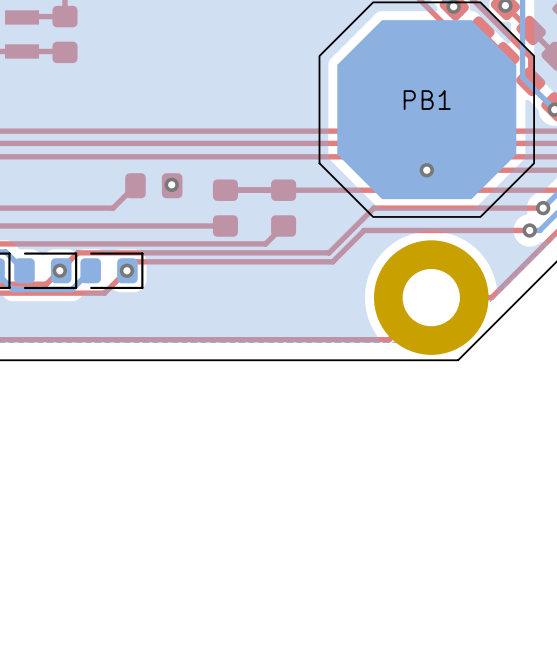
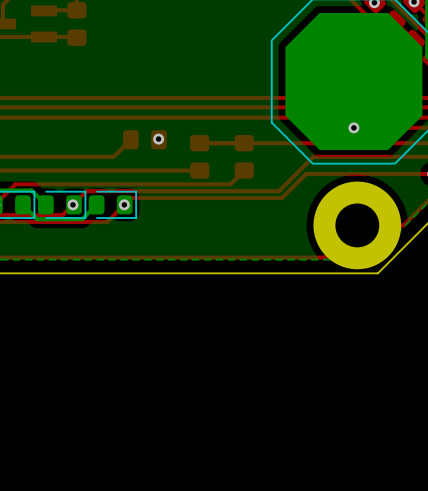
PB1 name: PB1 (427, 100) -> none

